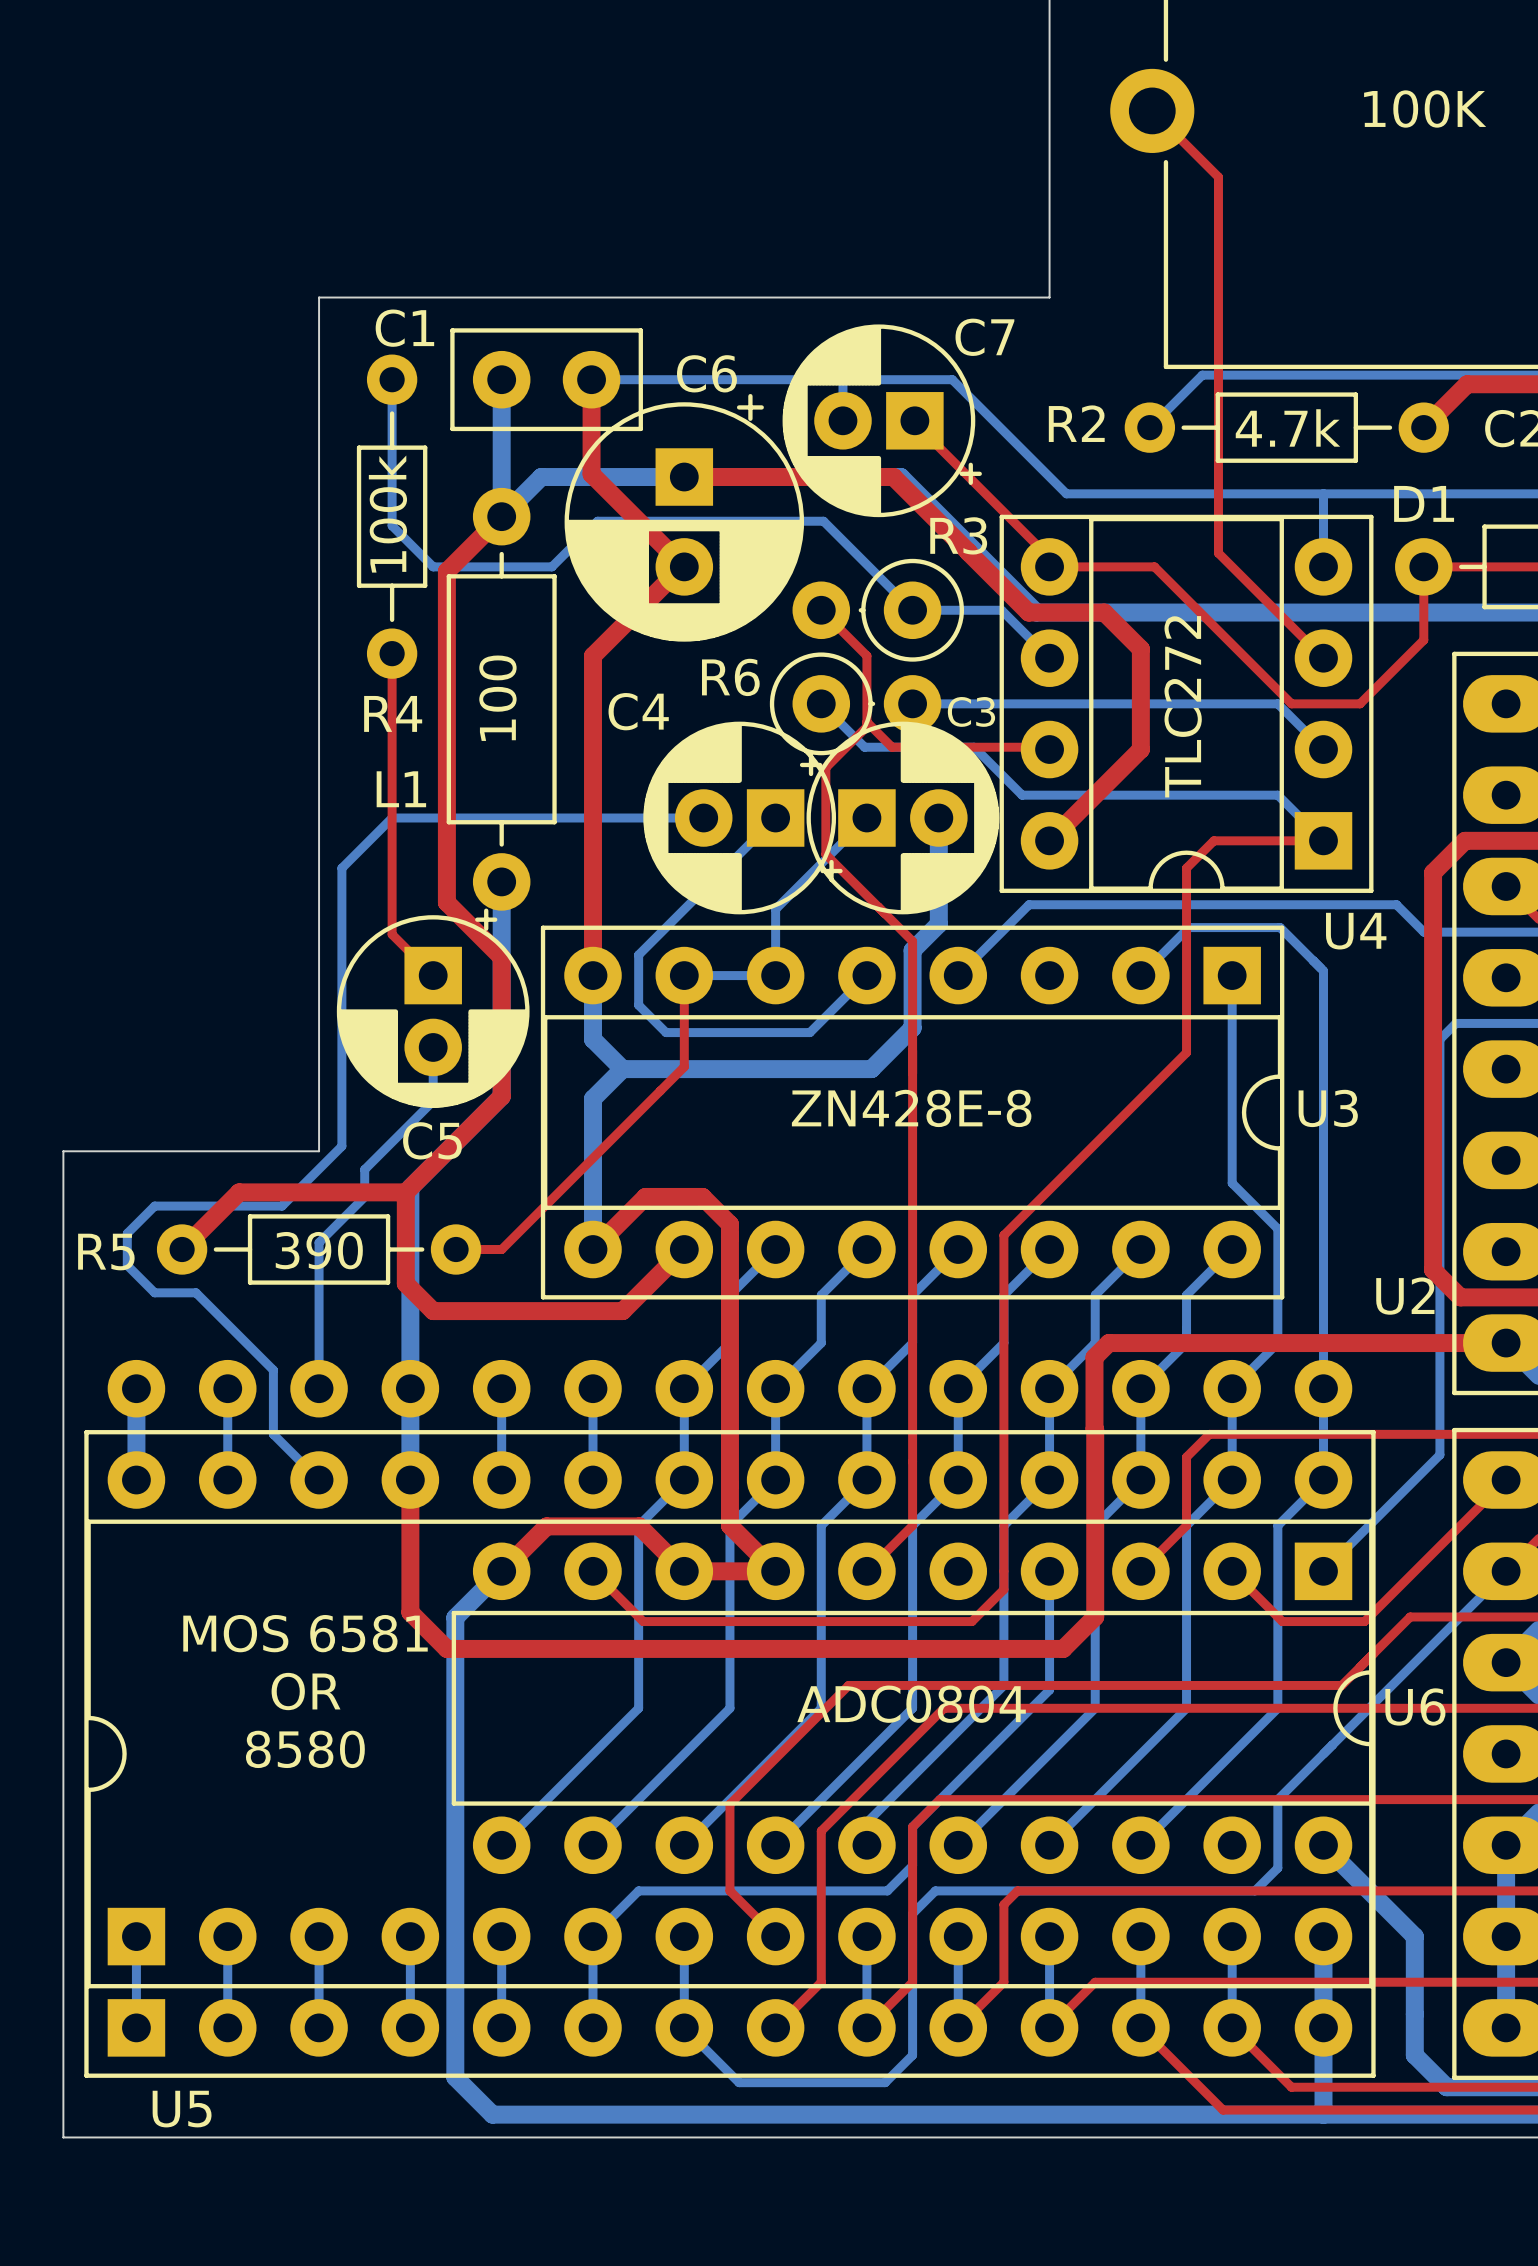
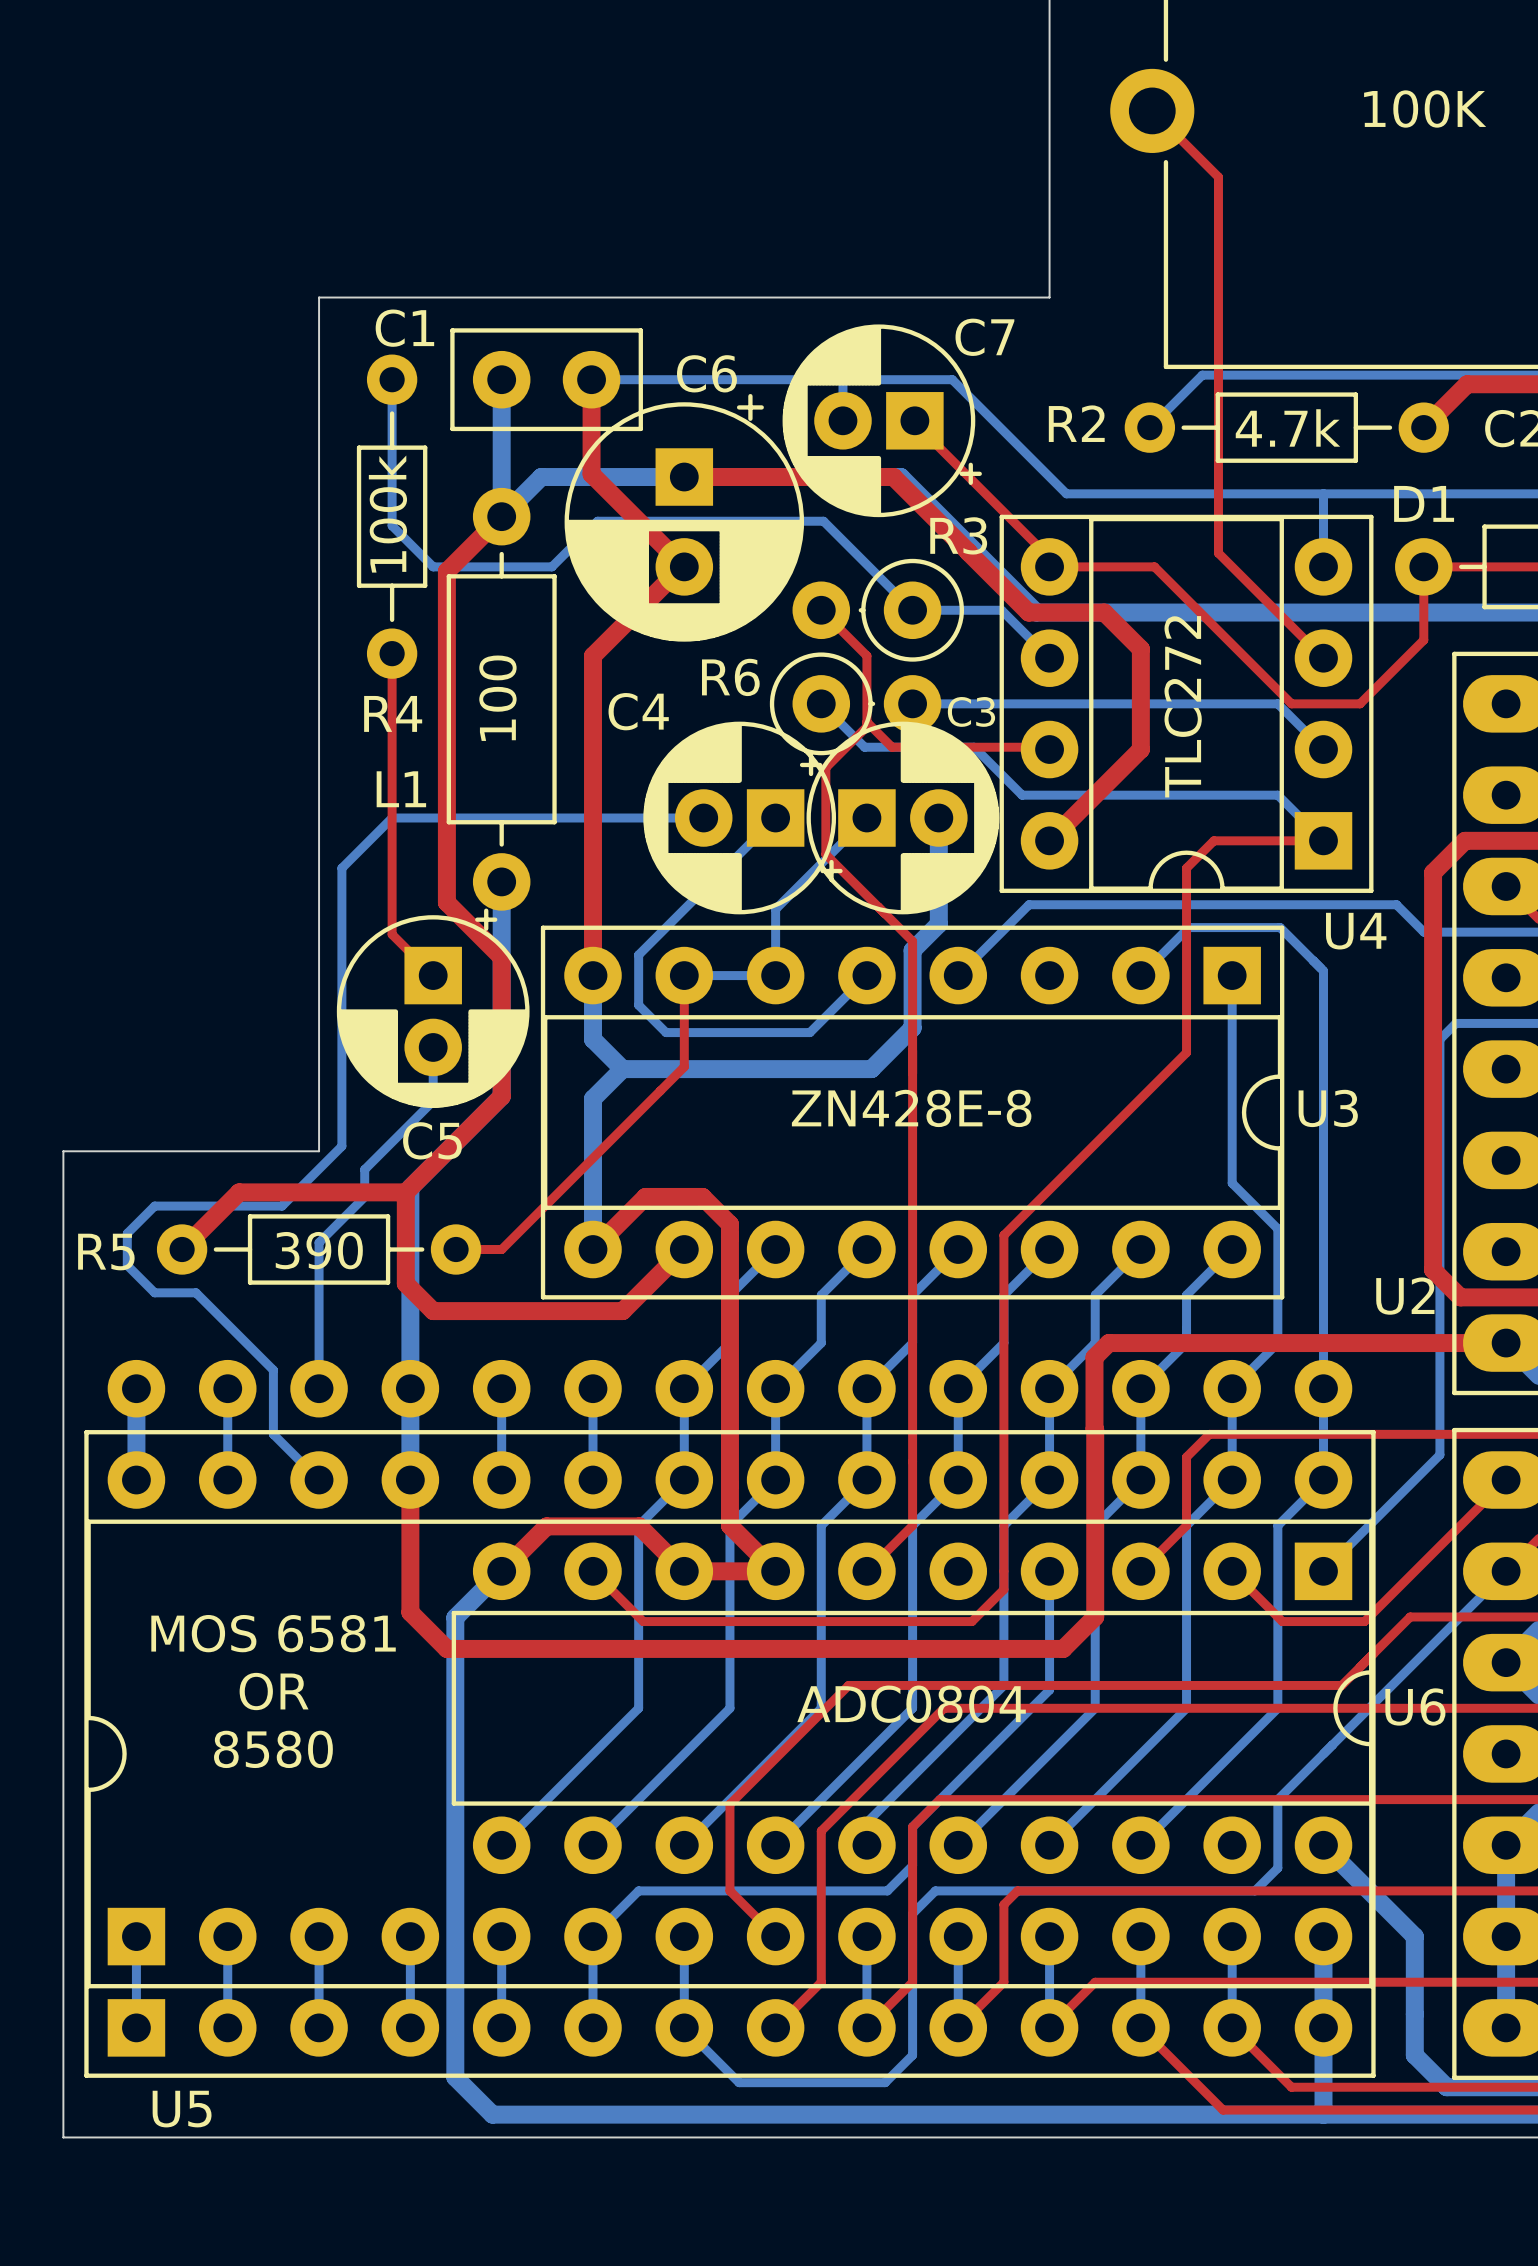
text position: MOS 6581 (305, 1633) -> MOS 6581 (273, 1633)
text position: OR (306, 1691) -> OR (274, 1691)
text position: 8580 (305, 1749) -> 8580 (273, 1749)

